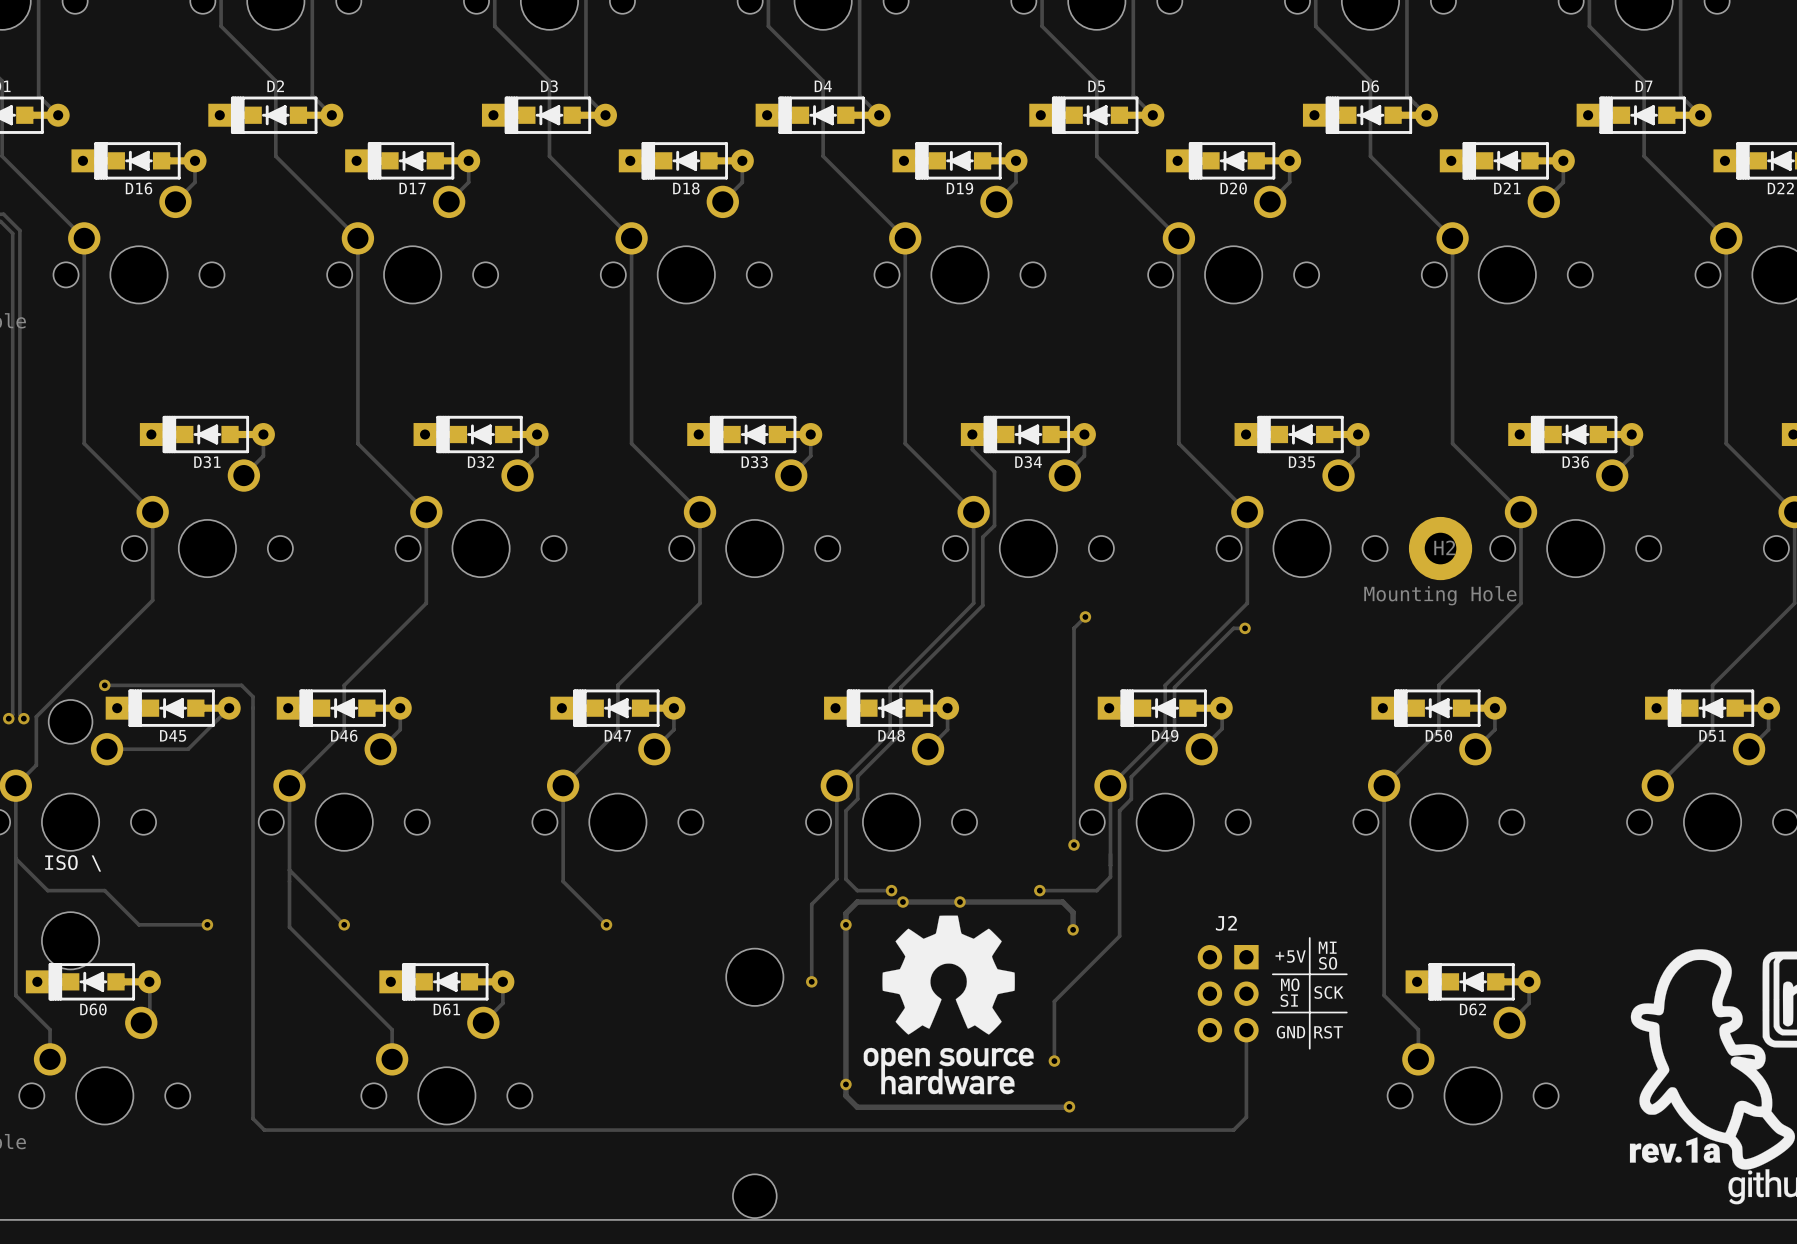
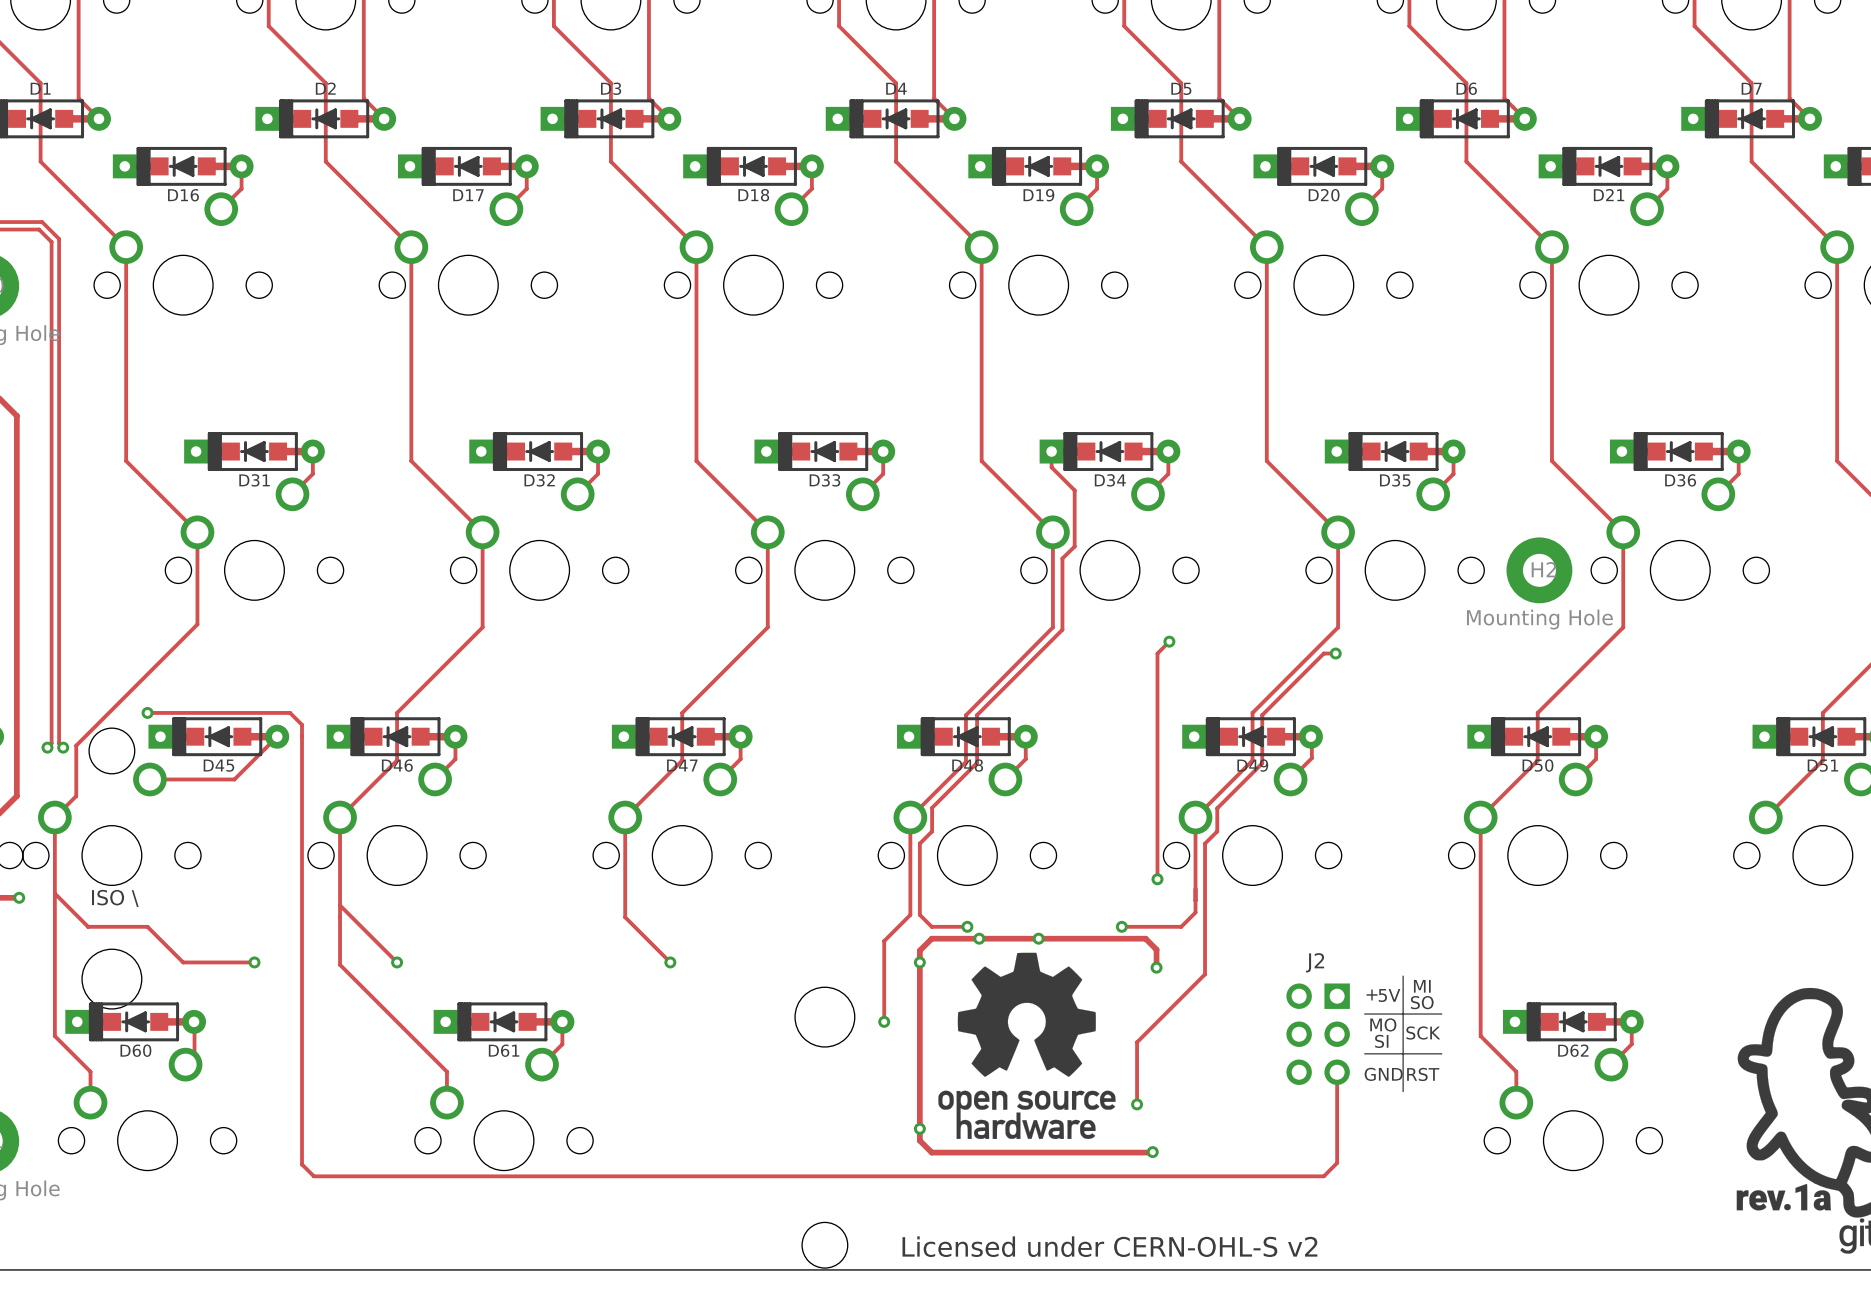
text: none -> Licensed under CERN-OHL-S v2 (1109, 1246)

